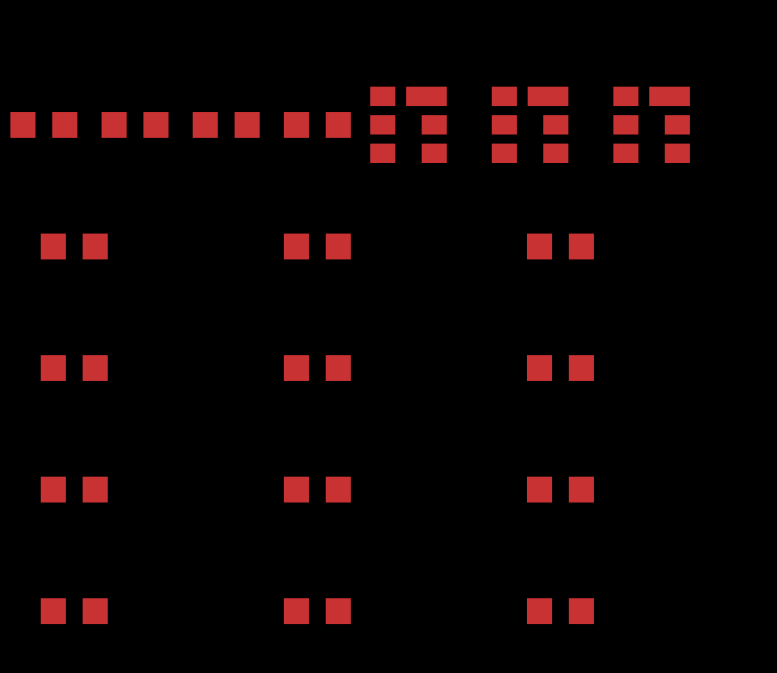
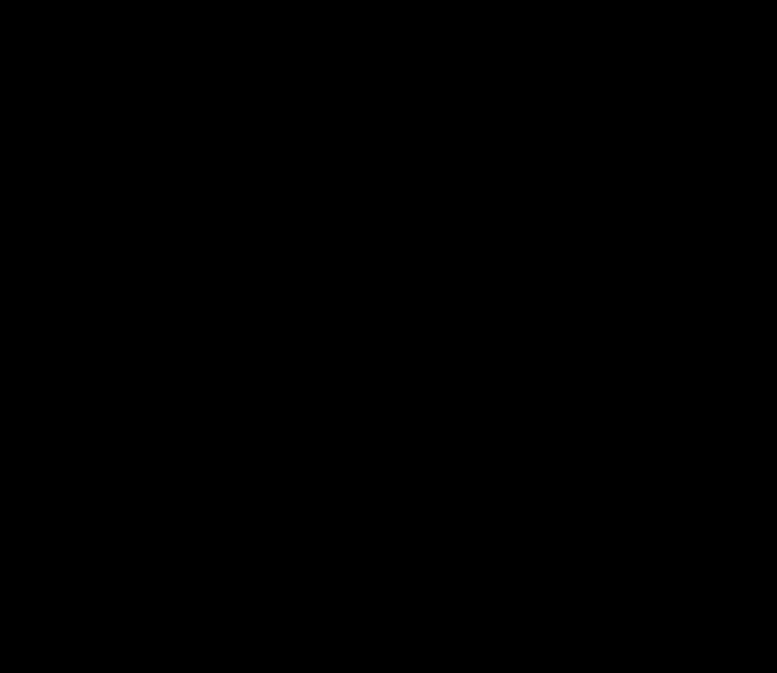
part: (43, 124) -> none
part: (135, 124) -> none
part: (226, 124) -> none
part: (317, 124) -> none
part: (408, 124) -> none
part: (530, 124) -> none
part: (651, 124) -> none
part: (74, 246) -> none
part: (317, 246) -> none
part: (560, 246) -> none
part: (74, 368) -> none
part: (317, 368) -> none
part: (560, 368) -> none
part: (74, 489) -> none
part: (317, 489) -> none
part: (560, 489) -> none
part: (74, 611) -> none
part: (317, 611) -> none
part: (560, 611) -> none

